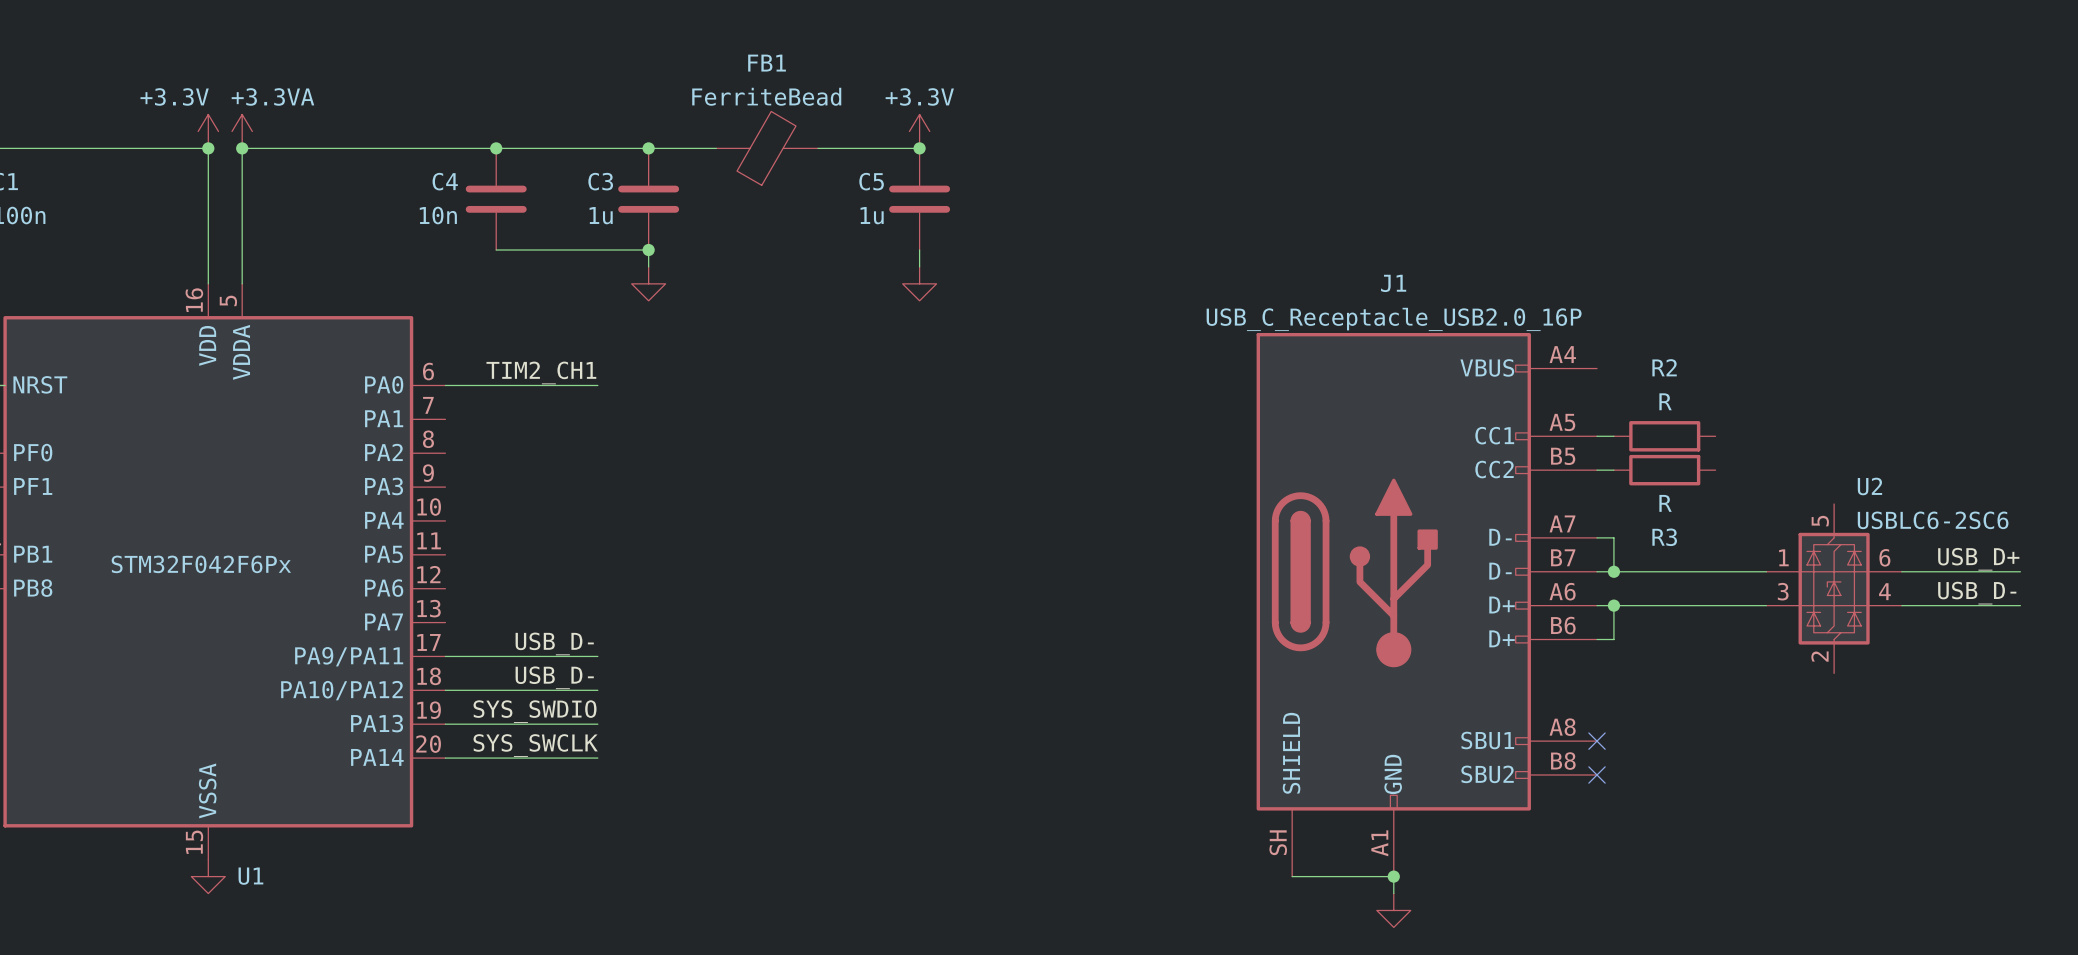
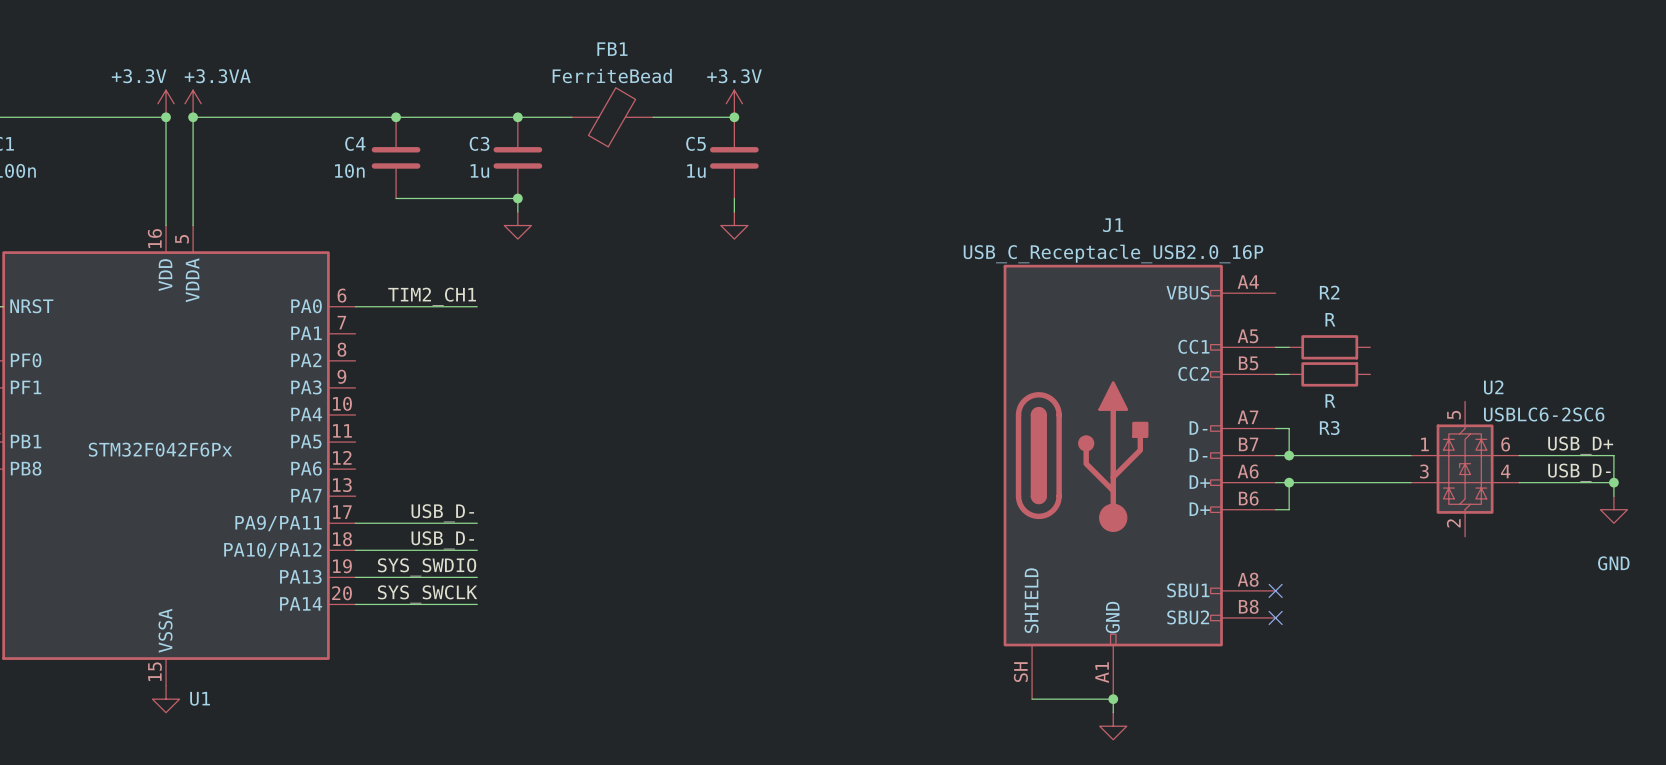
wire: none -> (1613, 455) (1613, 496)
junction: none -> (1613, 482)
power symbol: none -> GND (1613, 509)

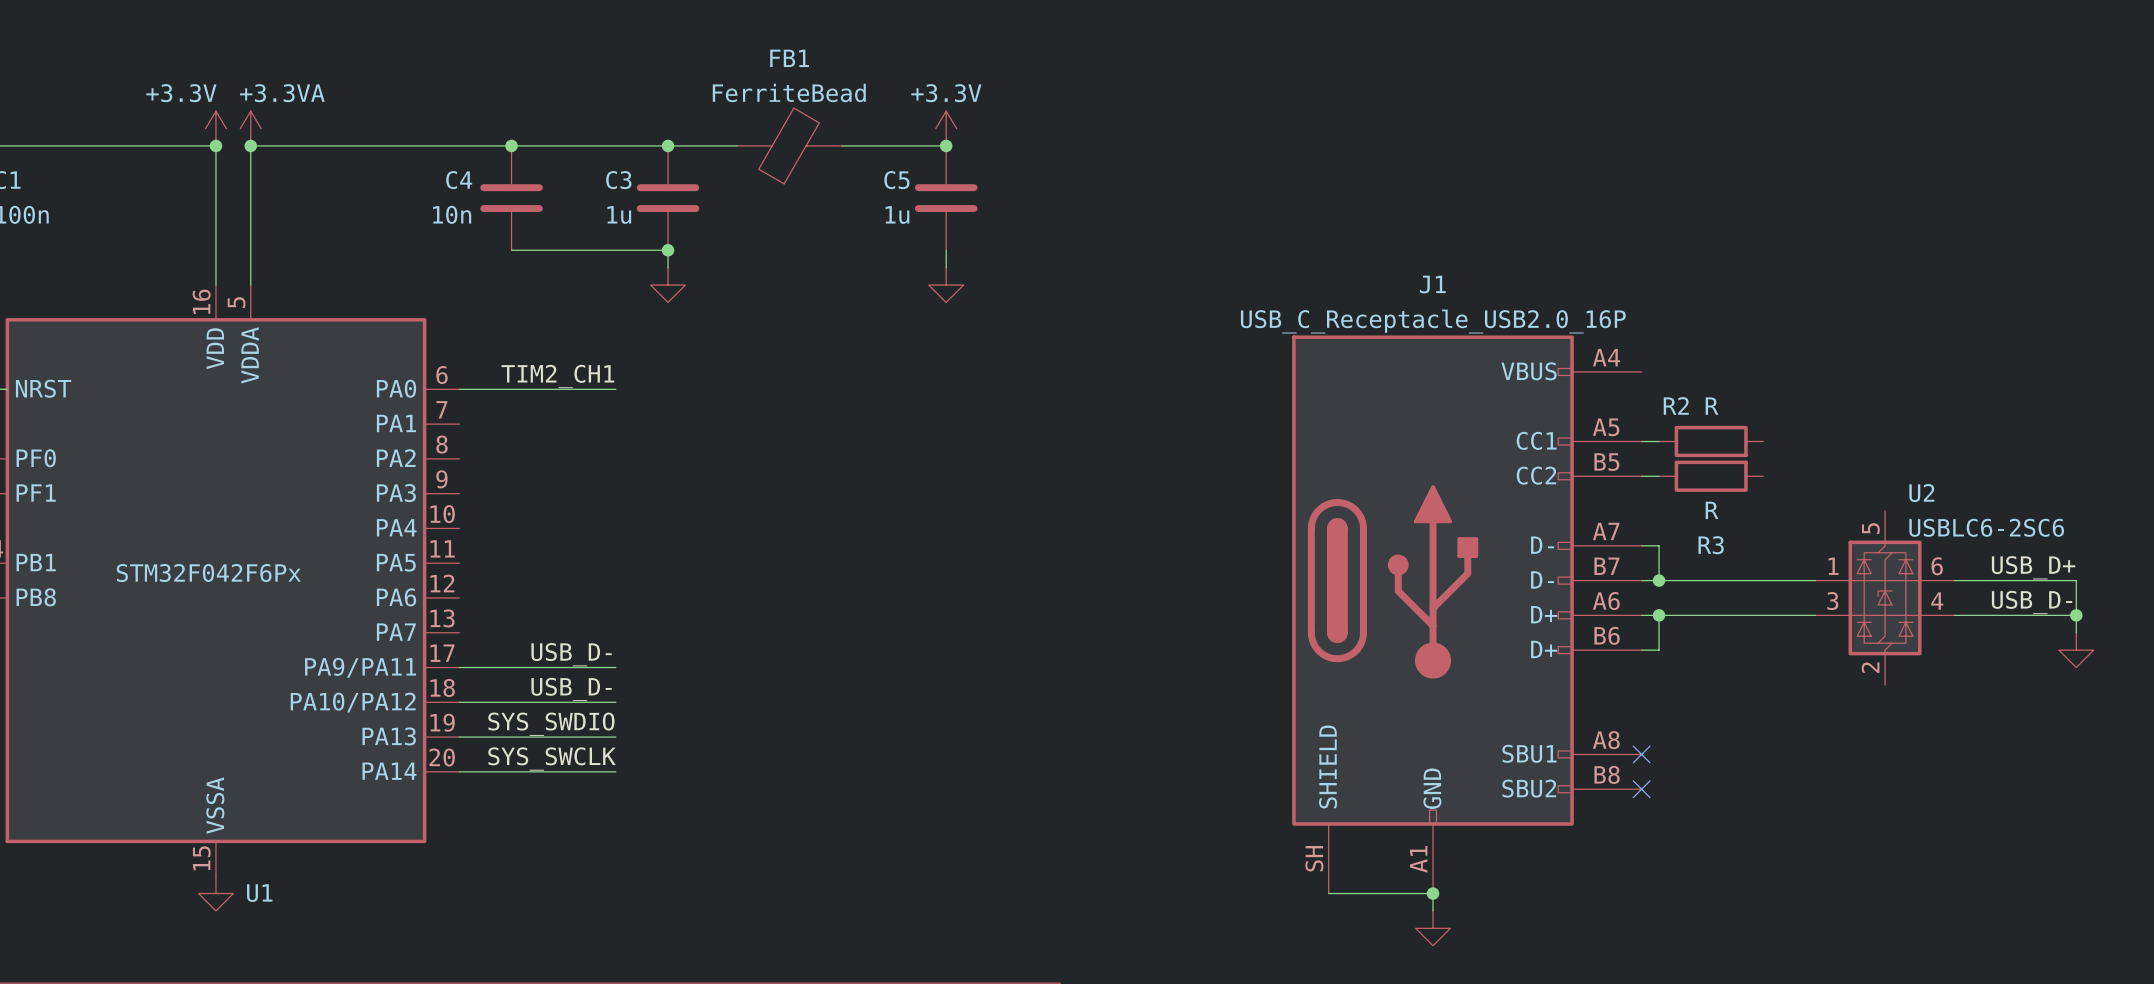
R2 name position: R2 (1329, 292) -> R2 (1676, 405)
power symbol text: GND (1613, 563) -> none

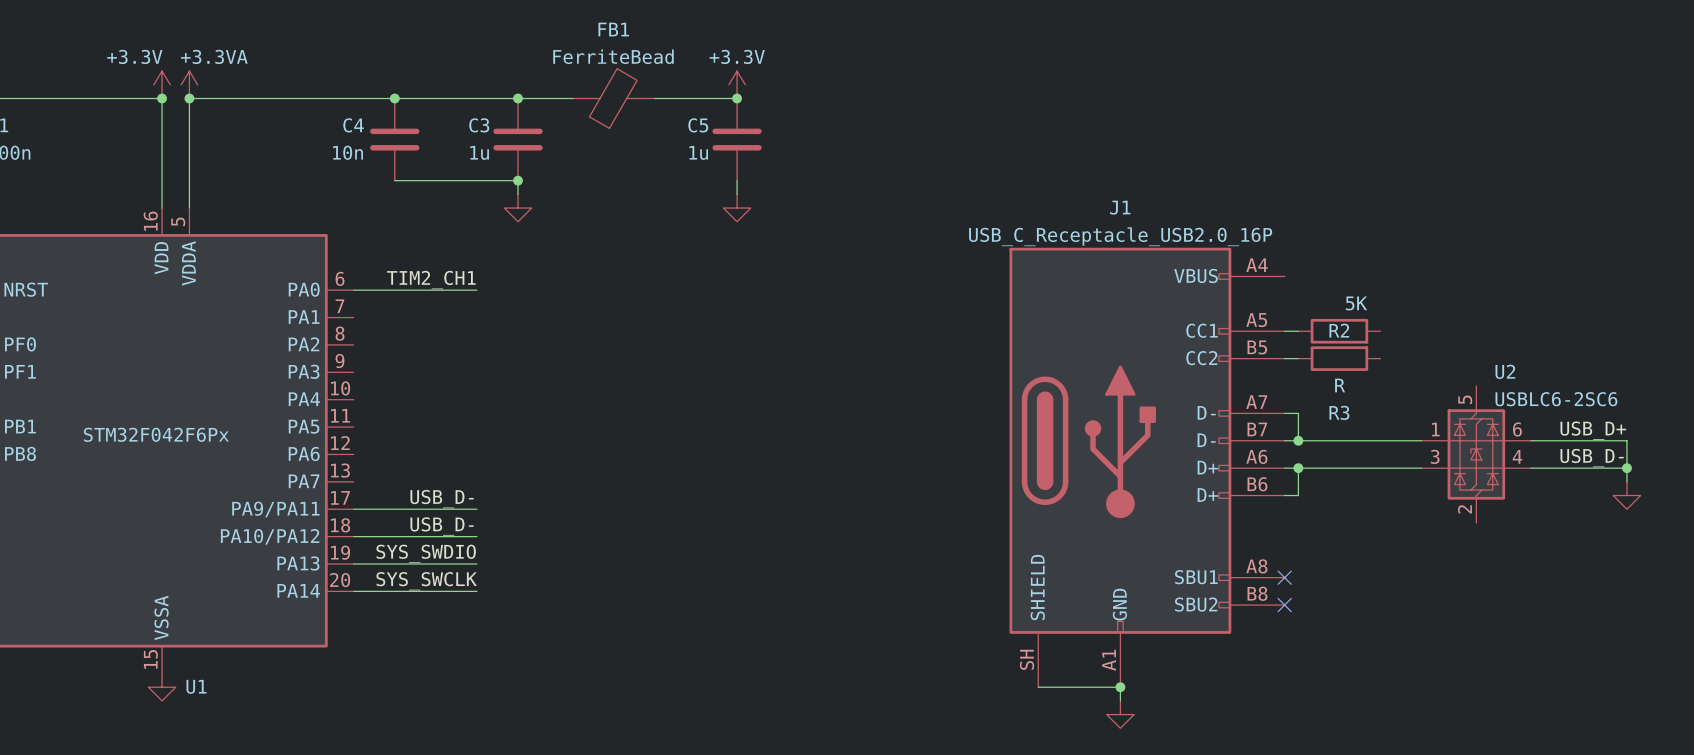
R2 name position: R2 (1676, 405) -> R2 (1339, 330)
R2 value: R (1712, 406) -> 5K (1356, 303)

